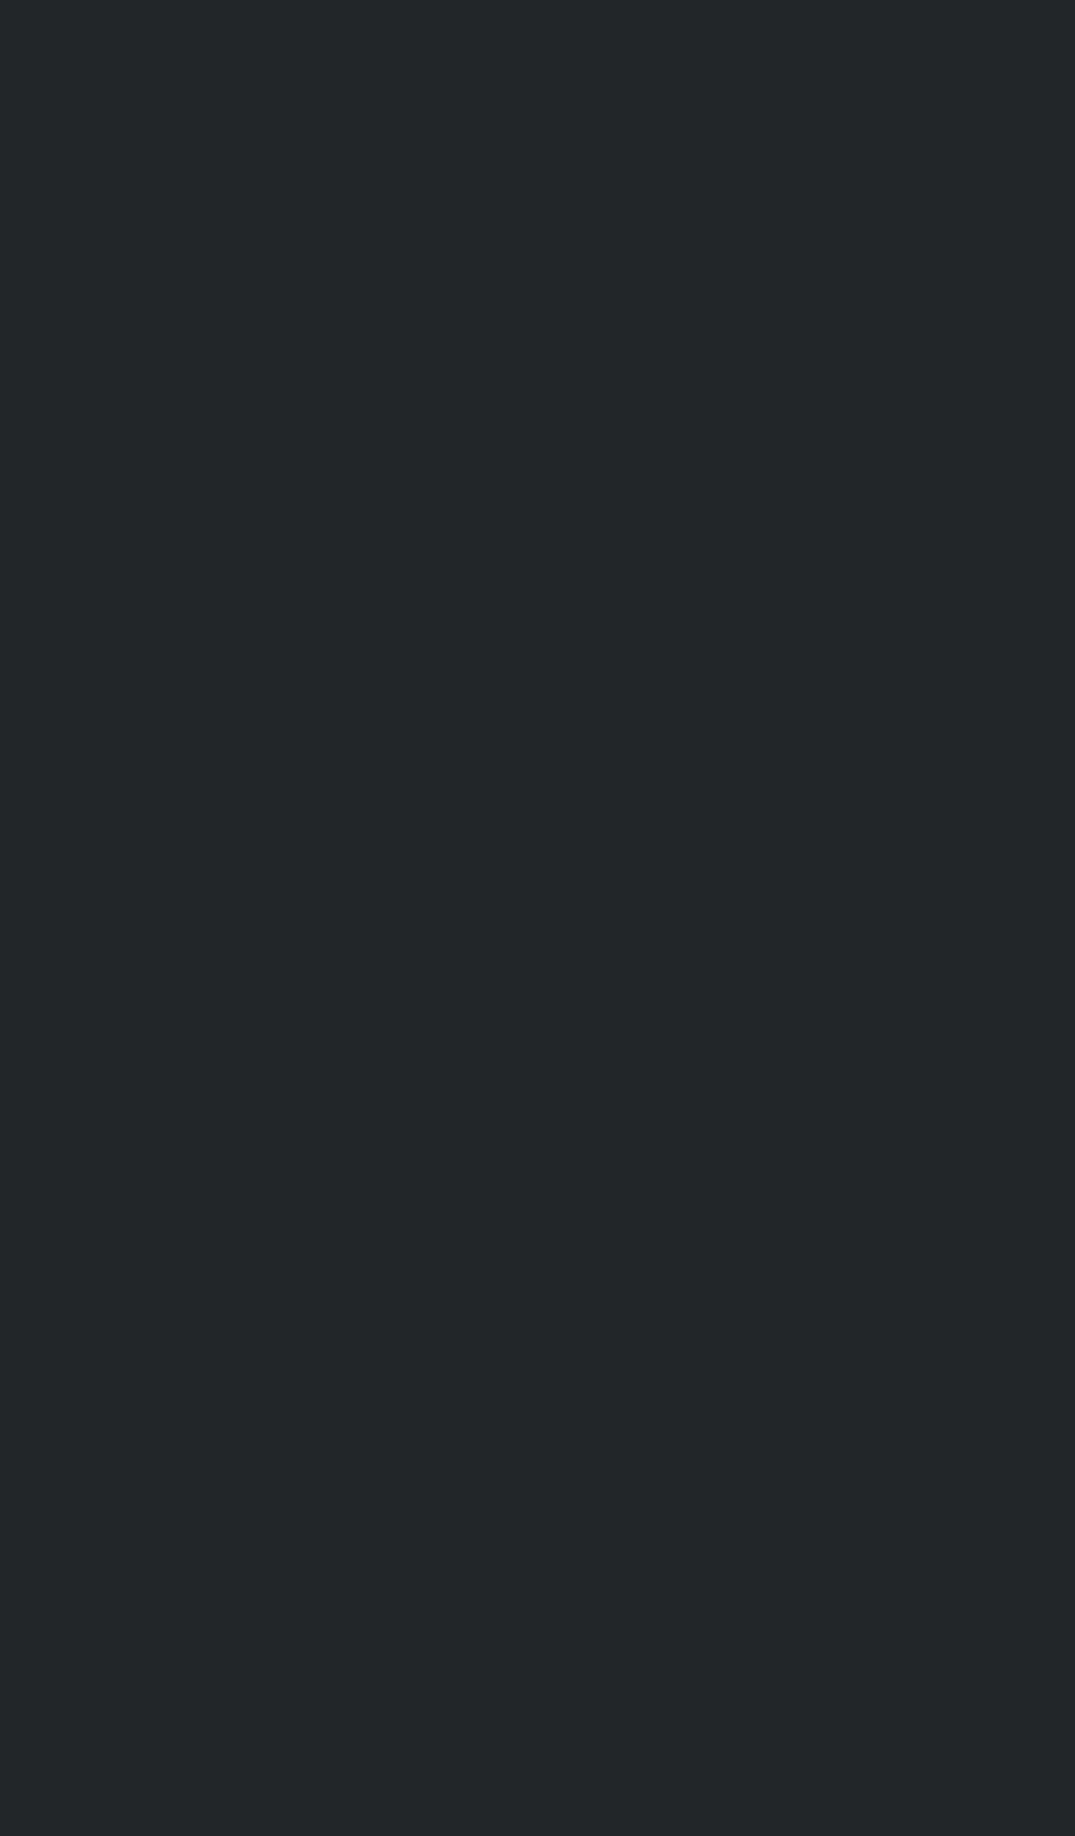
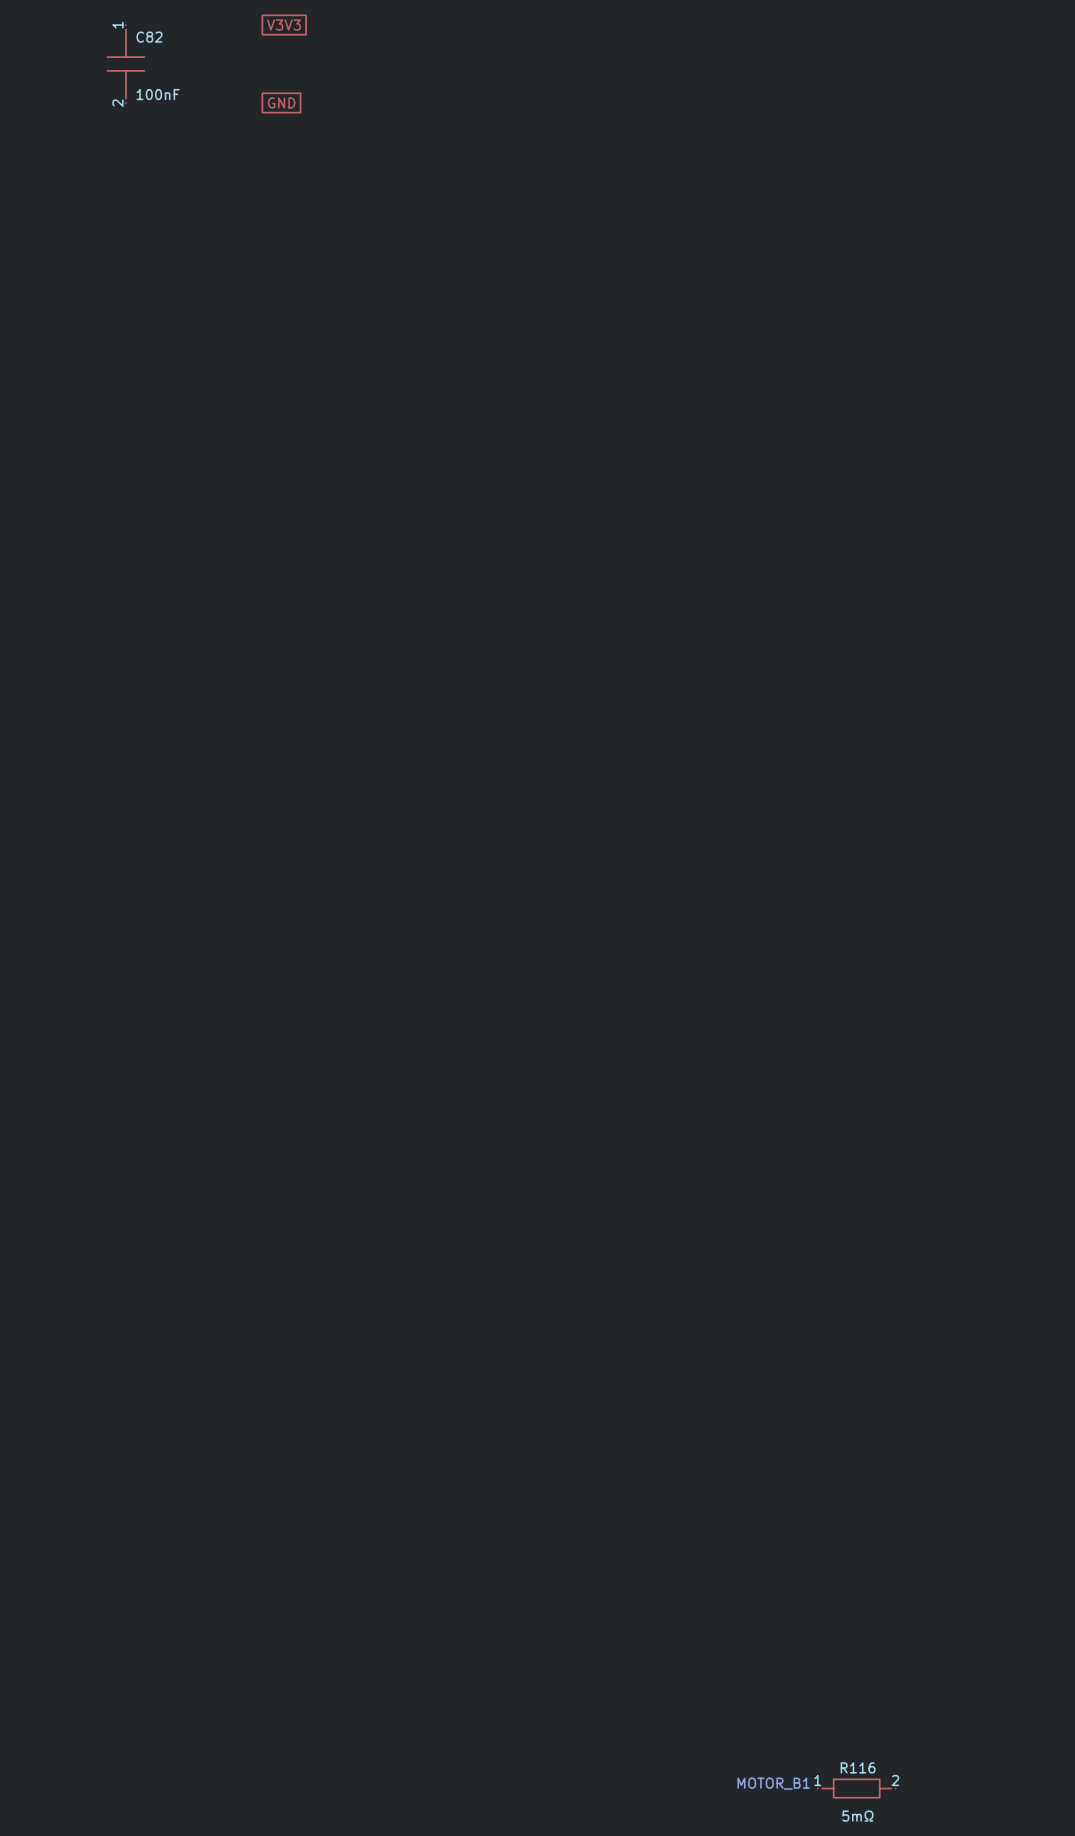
global label: none -> V3V3 (283, 25)
C82: none -> 100nF (125, 63)
global label: none -> GND (281, 102)
text: none -> MOTOR_B1 (773, 1783)
R116: none -> 5mΩ (856, 1788)

